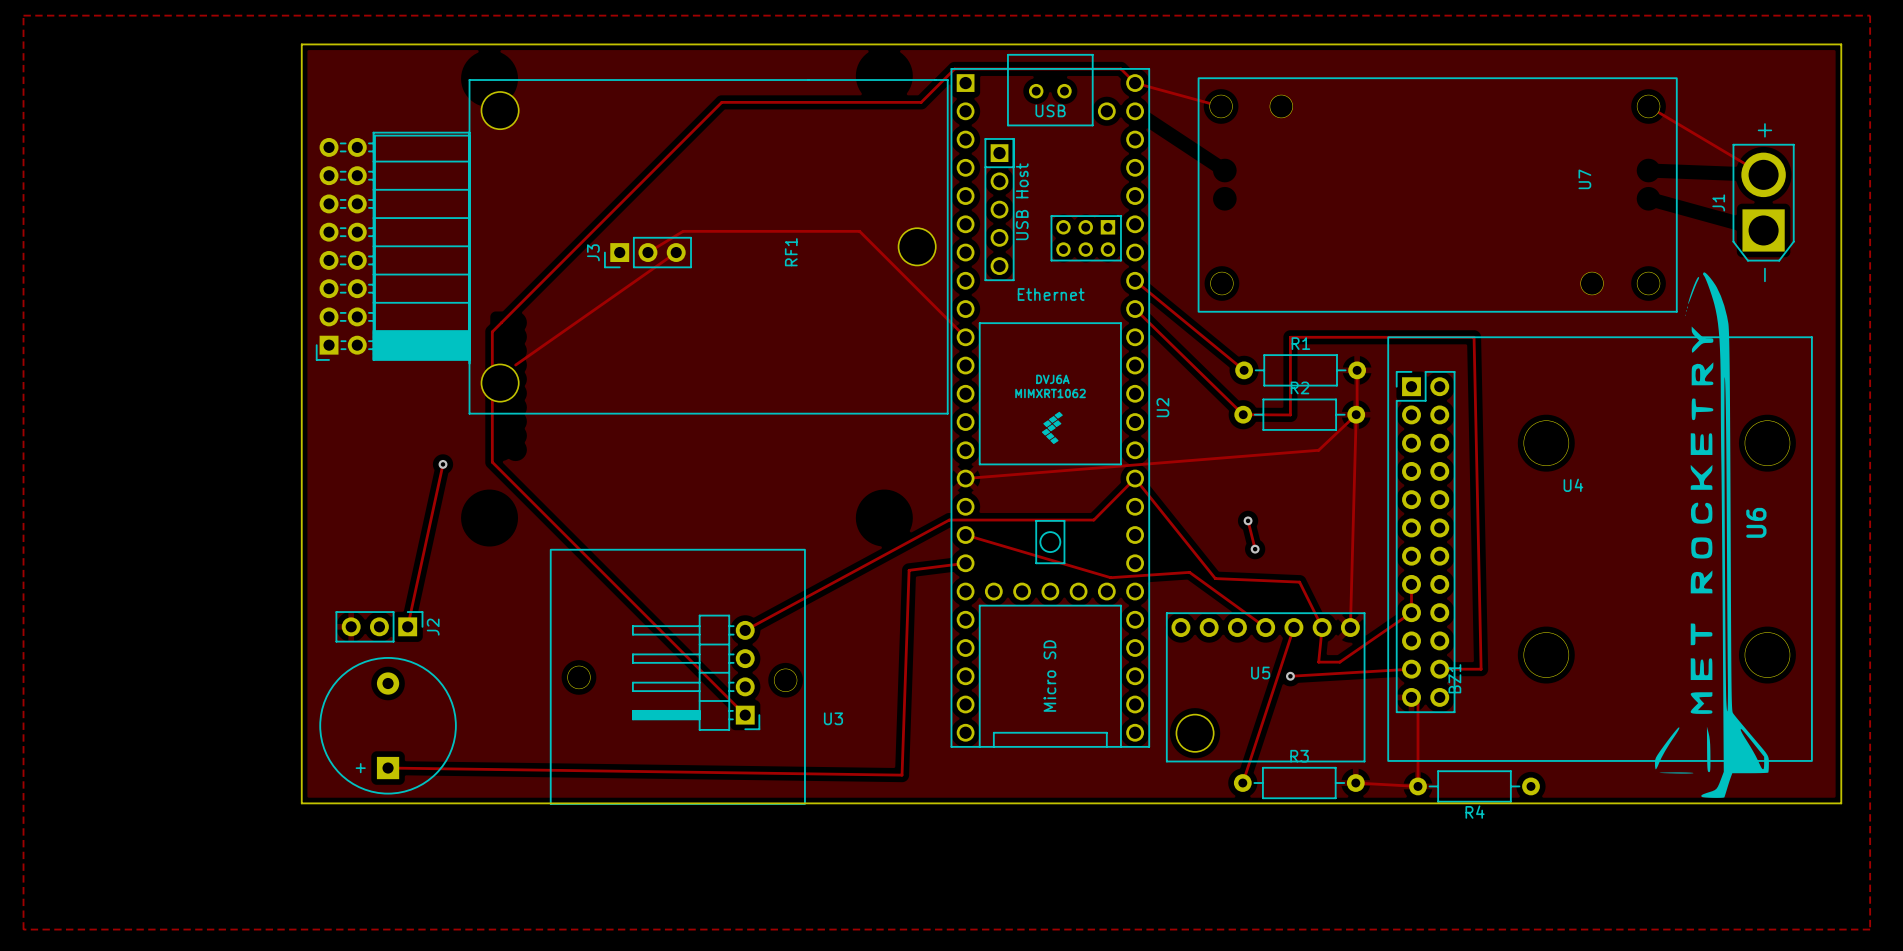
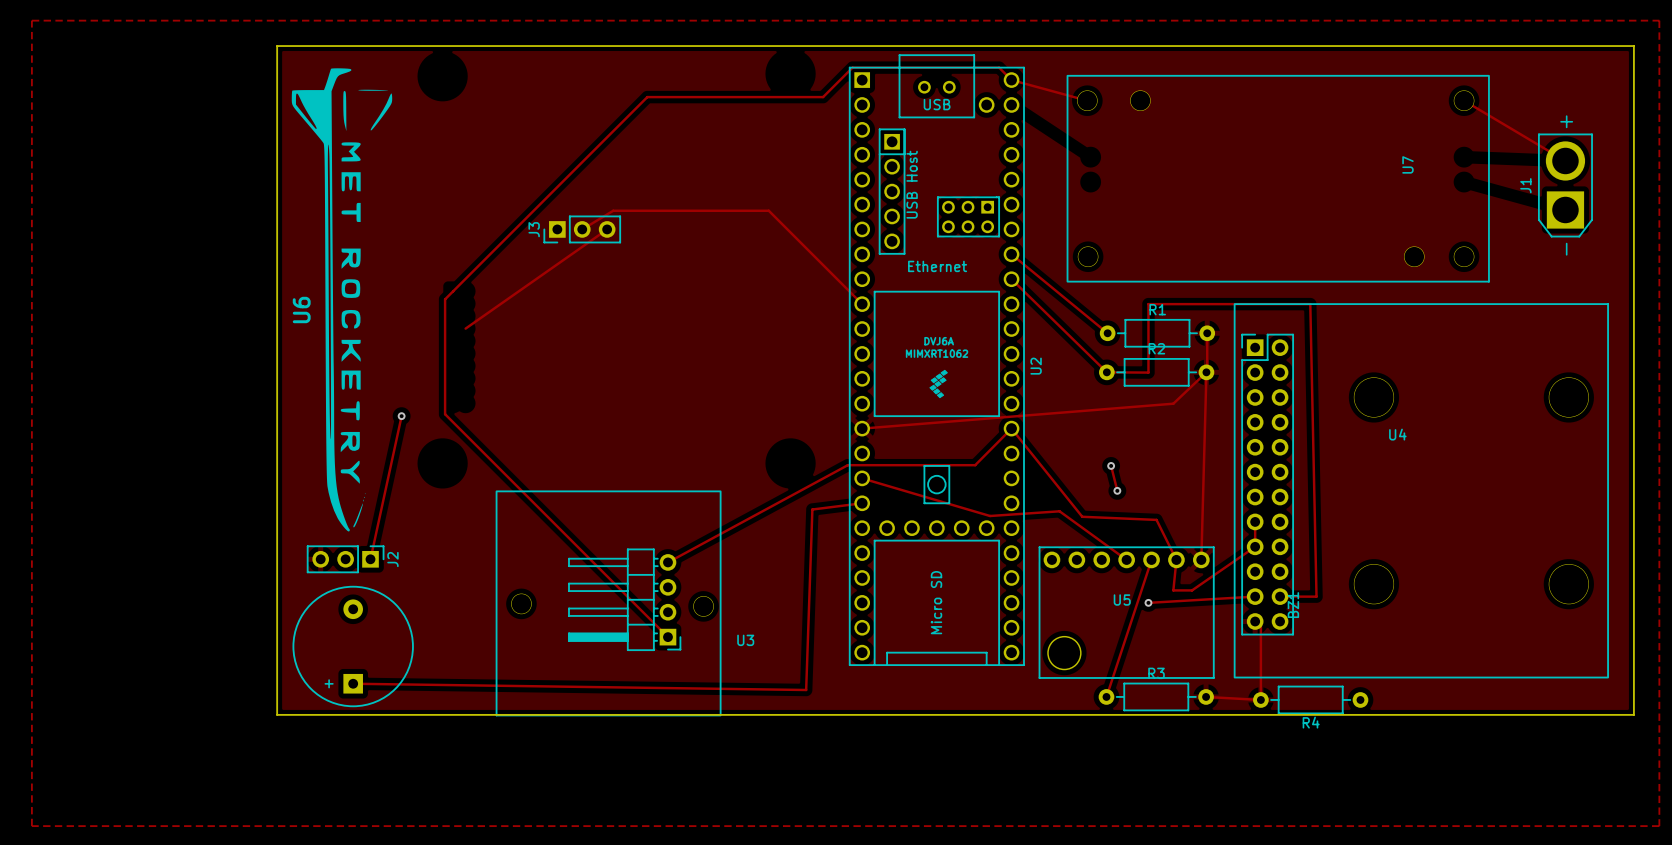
RF1: (632, 246) -> none
U6 rotation: 0° (1711, 535) -> 180° (341, 299)
U6 position: (1711, 535) -> (341, 299)

